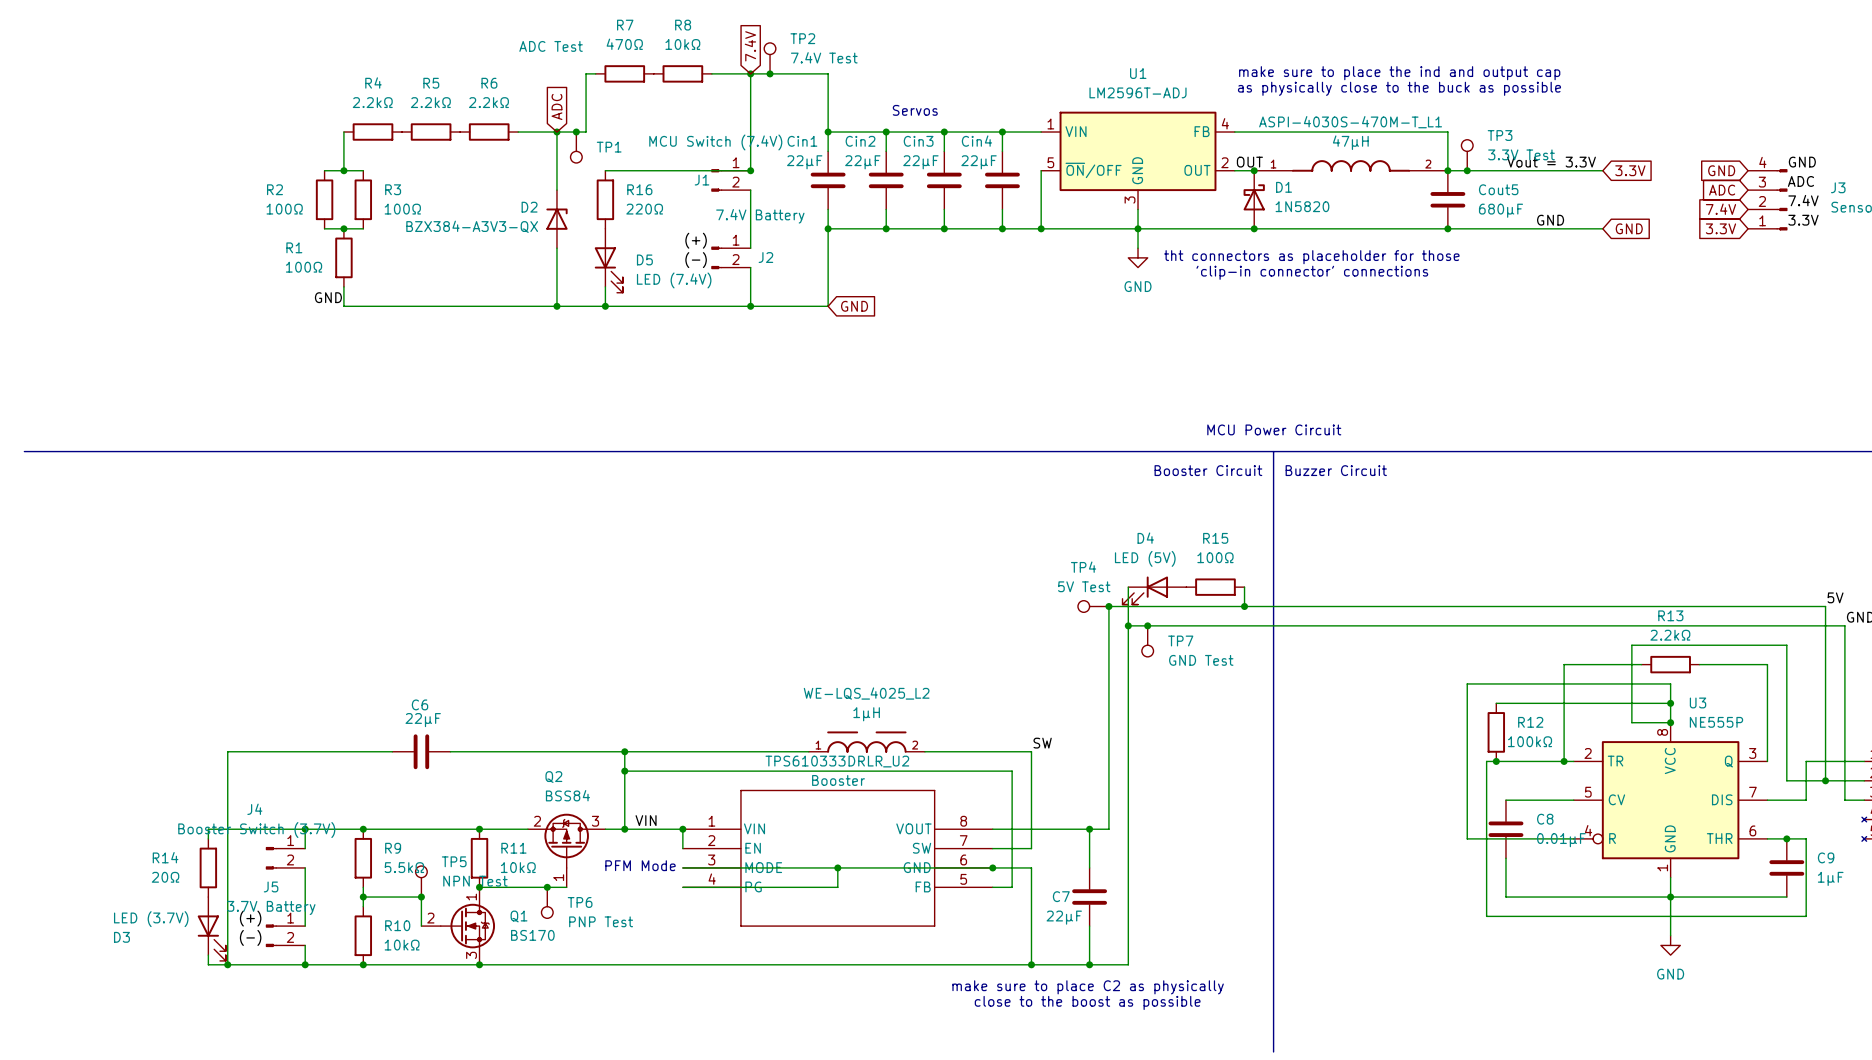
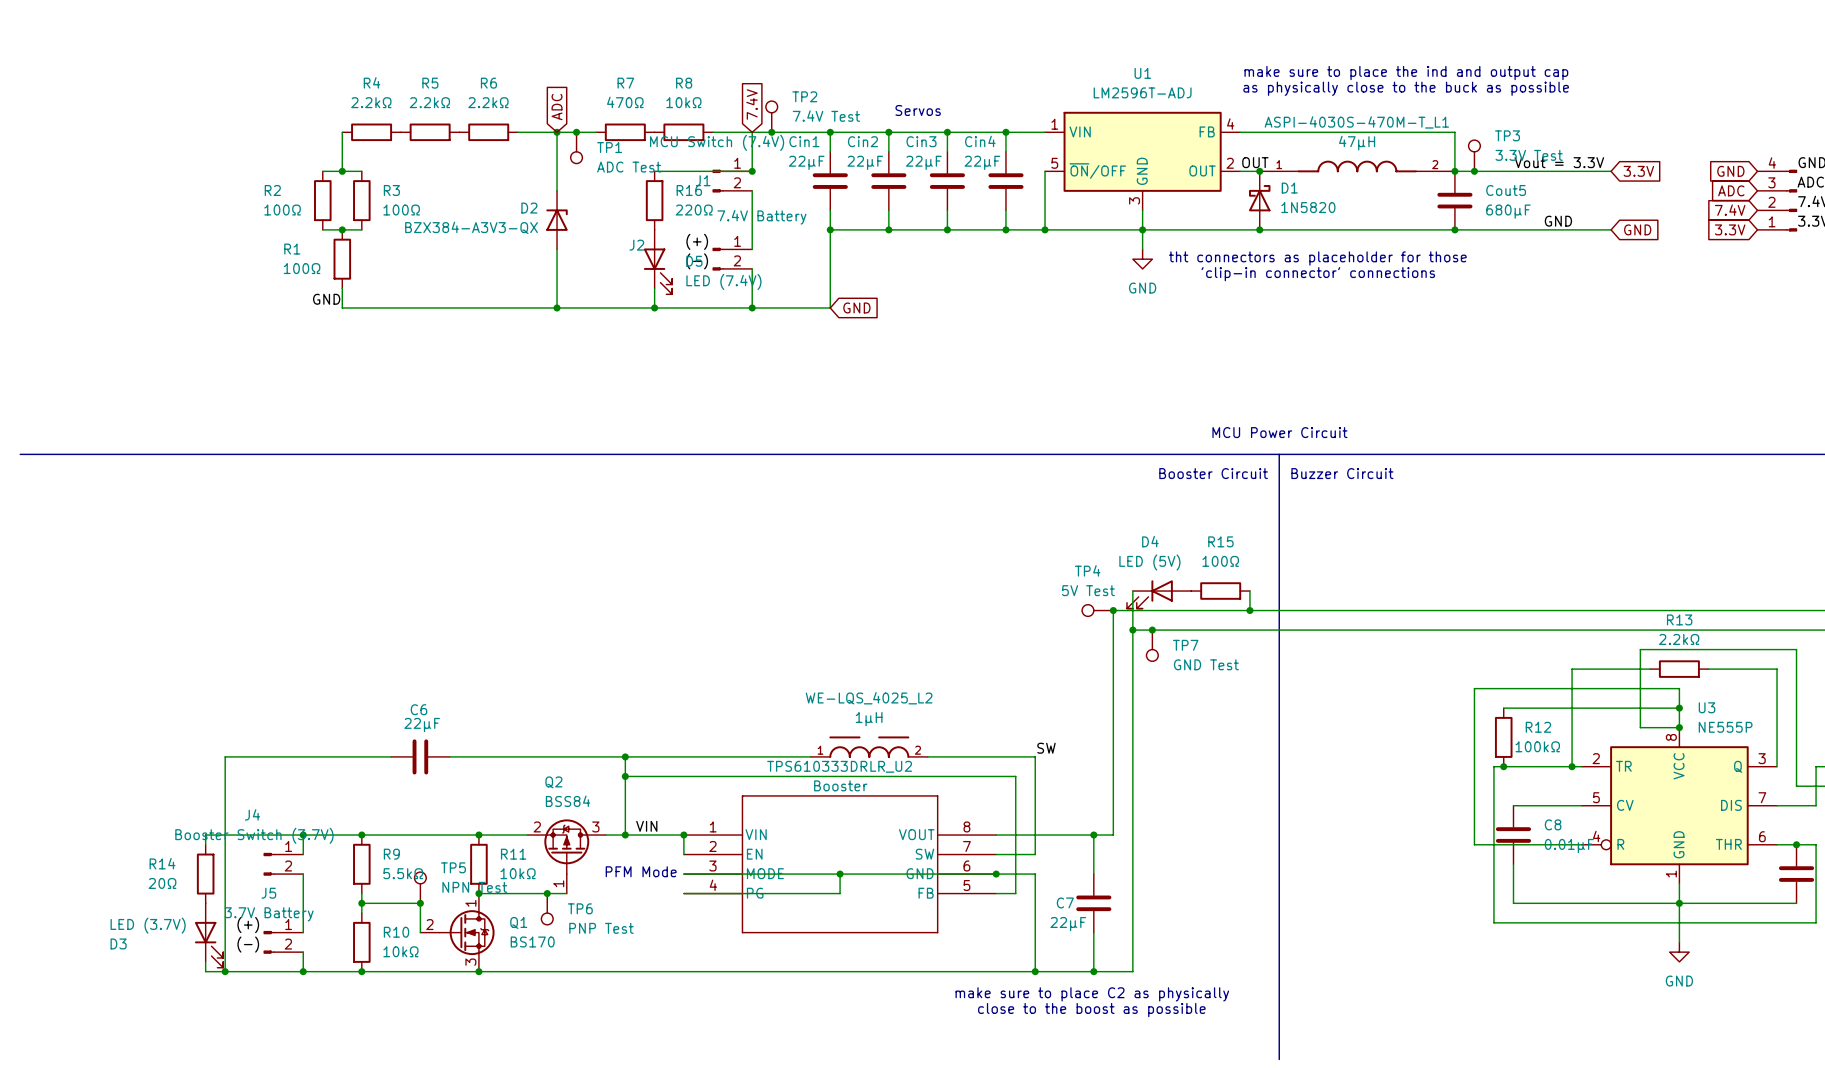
TP1 value position: ADC Test (551, 46) -> ADC Test (629, 167)
global label position: 7.4V (750, 46) -> 7.4V (751, 104)
TP2 position: (770, 58) -> (771, 116)
wire: (595, 73) (586, 73) (586, 132) -> (596, 132) (586, 132)
R7 position: (624, 73) -> (625, 132)
R8 position: (682, 73) -> (683, 132)
wire: (711, 73) (828, 73) (828, 132) -> (713, 132) (830, 132)
wire: (750, 73) (750, 132) -> none
junction: (750, 73) -> none
junction: (770, 73) -> none
junction: none -> (771, 132)
wire: (605, 170) (653, 170) -> none
R16 position: (605, 199) -> (654, 200)
J2 name position: J2 (765, 257) -> J2 (636, 245)
D5 position: (608, 260) -> (658, 262)
wire: (605, 286) (605, 306) -> (654, 288) (654, 307)
junction: (605, 306) -> none
junction: none -> (654, 307)

